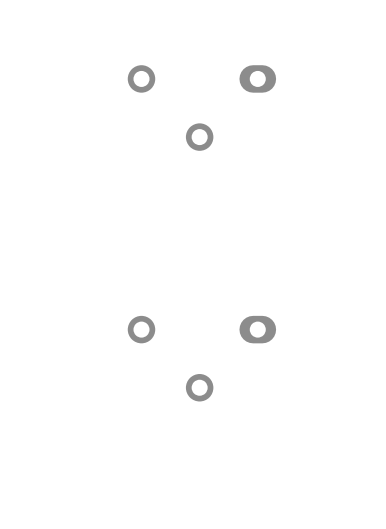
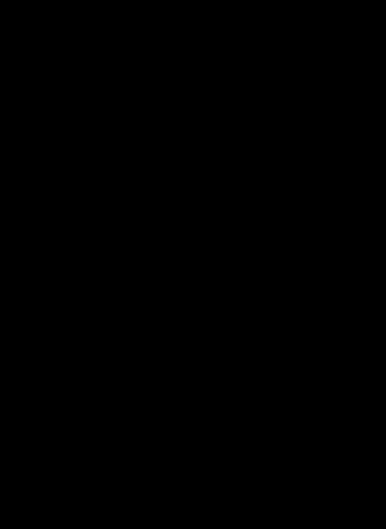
part: (201, 108) -> none
part: (201, 358) -> none

